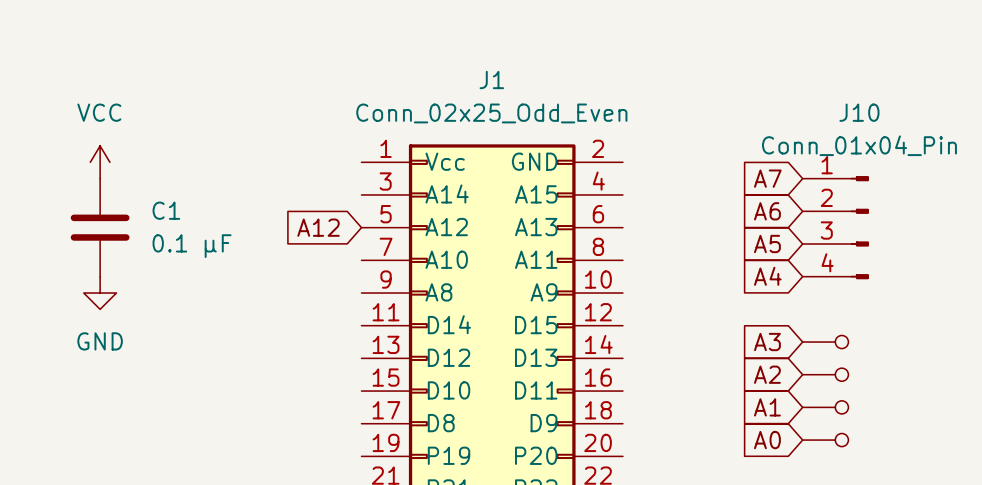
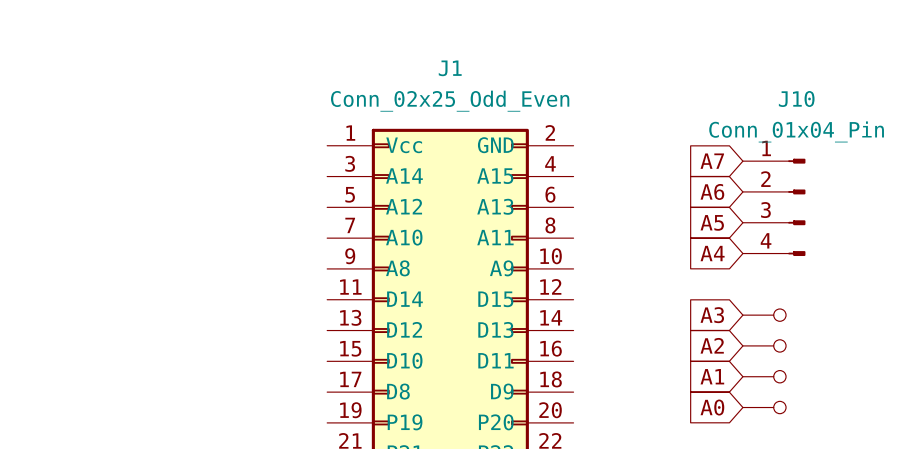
power symbol: VCC (100, 162) -> none
C1: 0.1 μF (100, 227) -> none
global label: A12 (318, 227) -> none
power symbol: GND (100, 293) -> none

